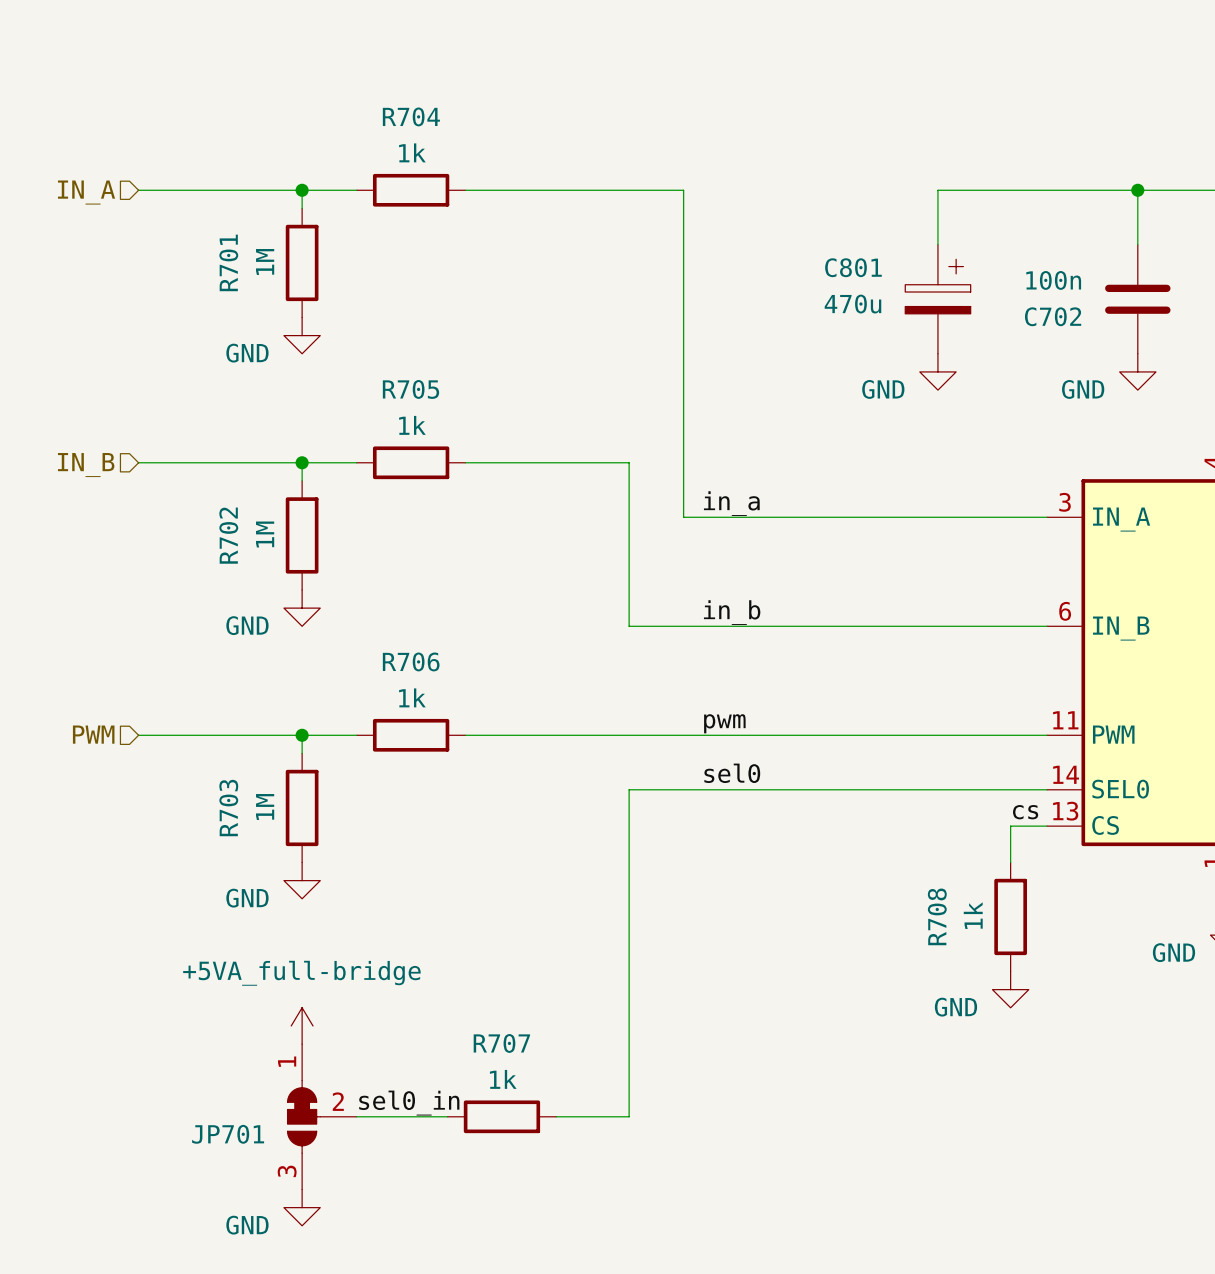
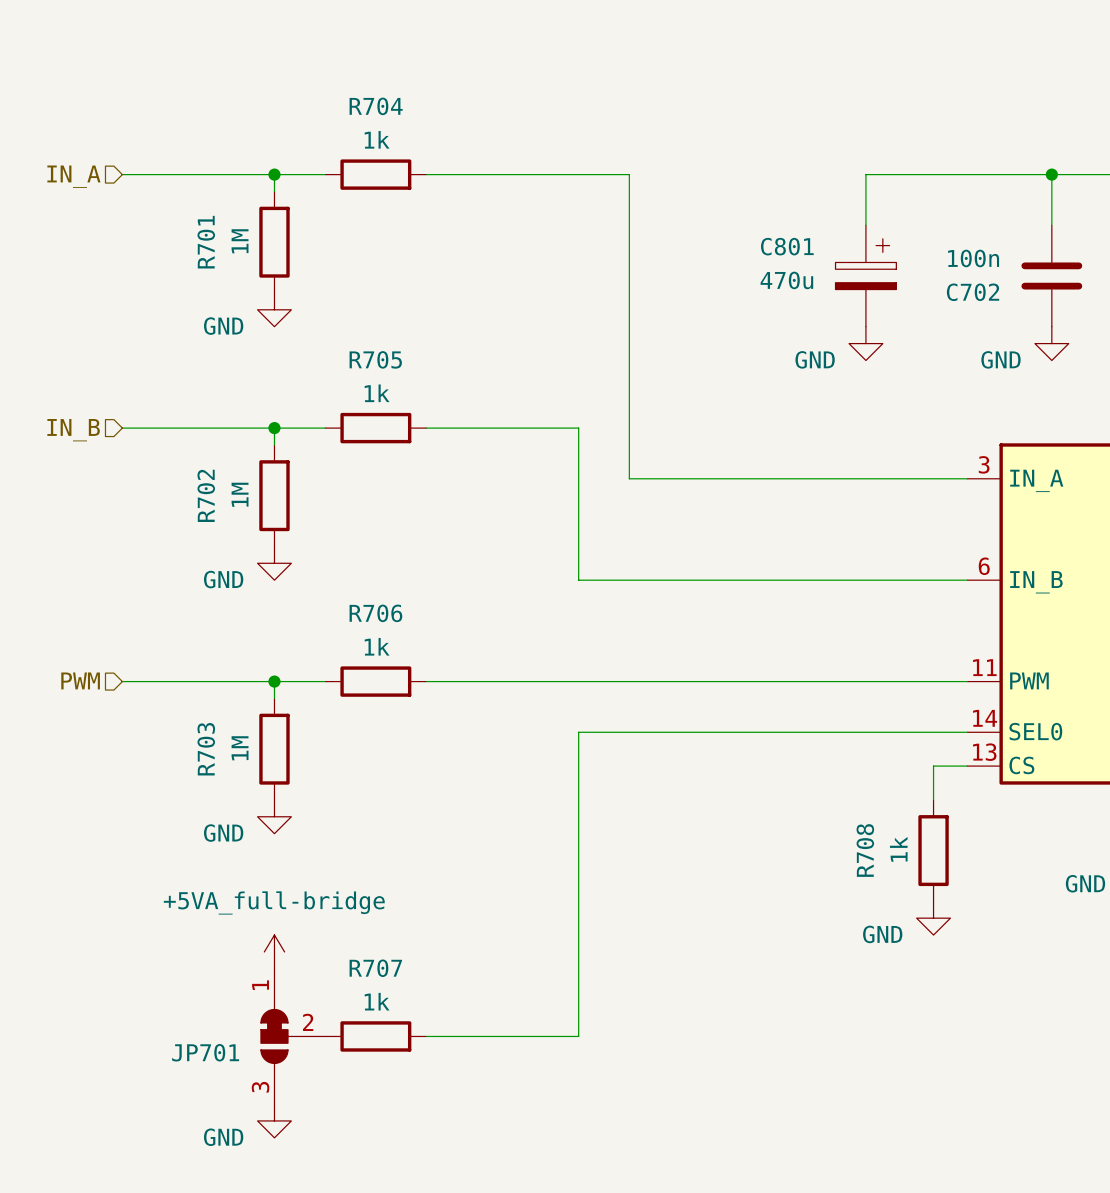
label: in_a (731, 503) -> none
label: in_b (732, 612) -> none
label: pwm (724, 723) -> none
label: sel0 (732, 773) -> none
label: cs (1025, 812) -> none
label: sel0_in (409, 1103) -> none
wire: (356, 1116) (447, 1116) -> (426, 1036) (511, 1036)
R707 position: (501, 1116) -> (375, 1036)

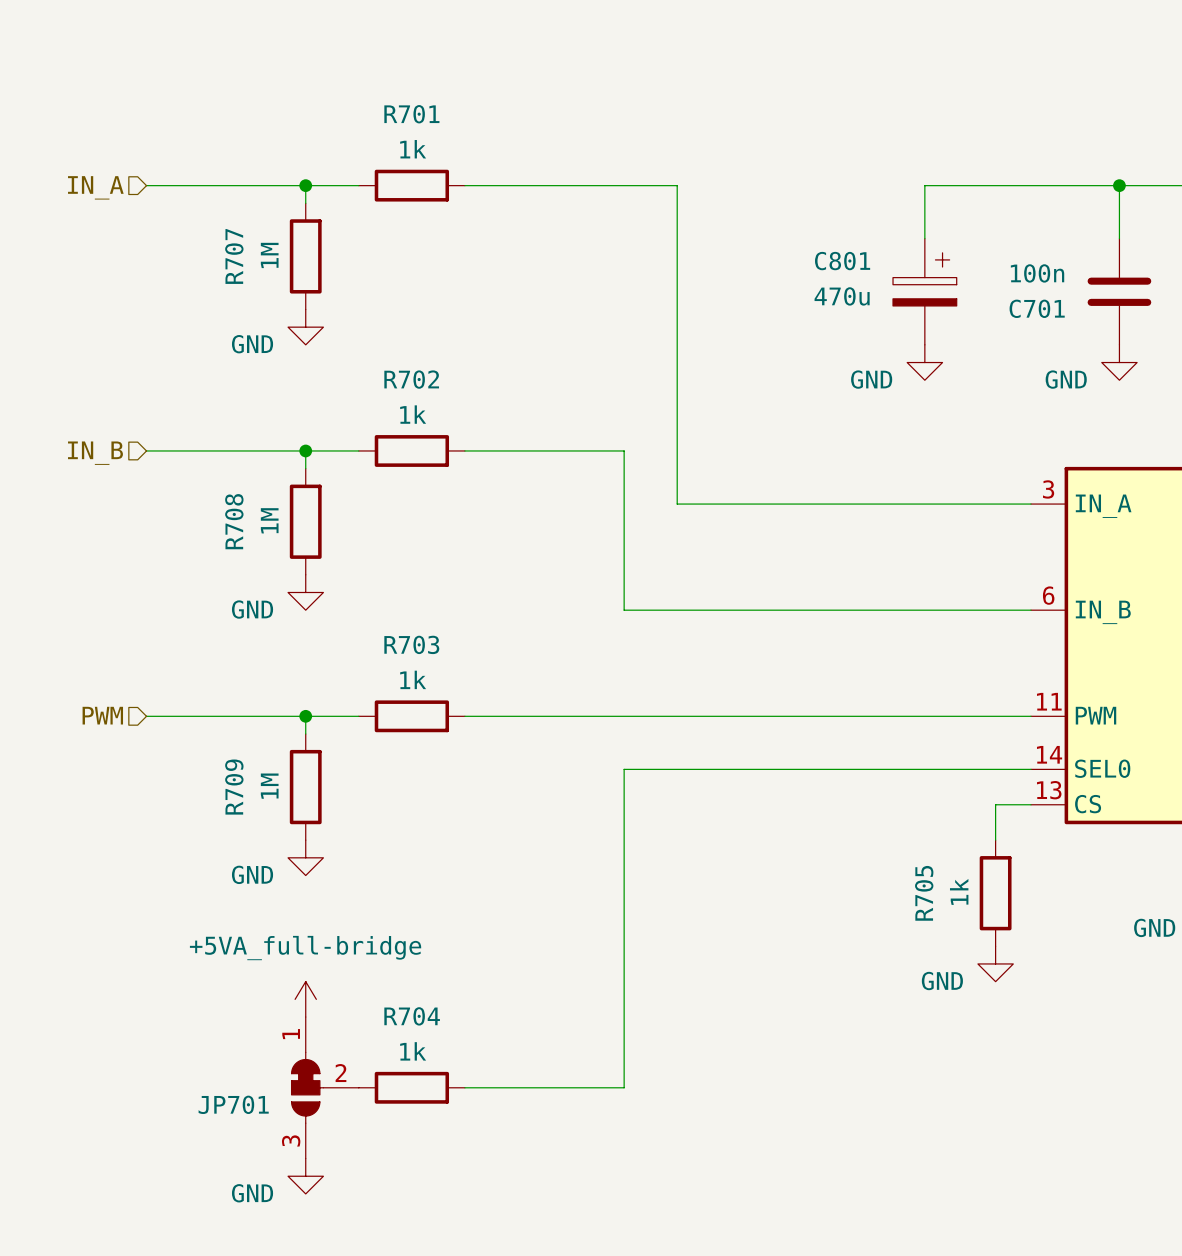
R704 name: R704 (376, 106) -> R701 (411, 114)
R701 name: R701 (206, 242) -> R707 (234, 256)
C702 name: C702 (973, 292) -> C701 (1037, 308)
R705 name: R705 (375, 359) -> R702 (411, 379)
R702 name: R702 (206, 495) -> R708 (234, 521)
R706 name: R706 (375, 613) -> R703 (411, 644)
R703 name: R703 (206, 749) -> R709 (234, 787)
R708 name: R708 (865, 850) -> R705 (924, 893)
R707 name: R707 (375, 968) -> R704 (412, 1016)

